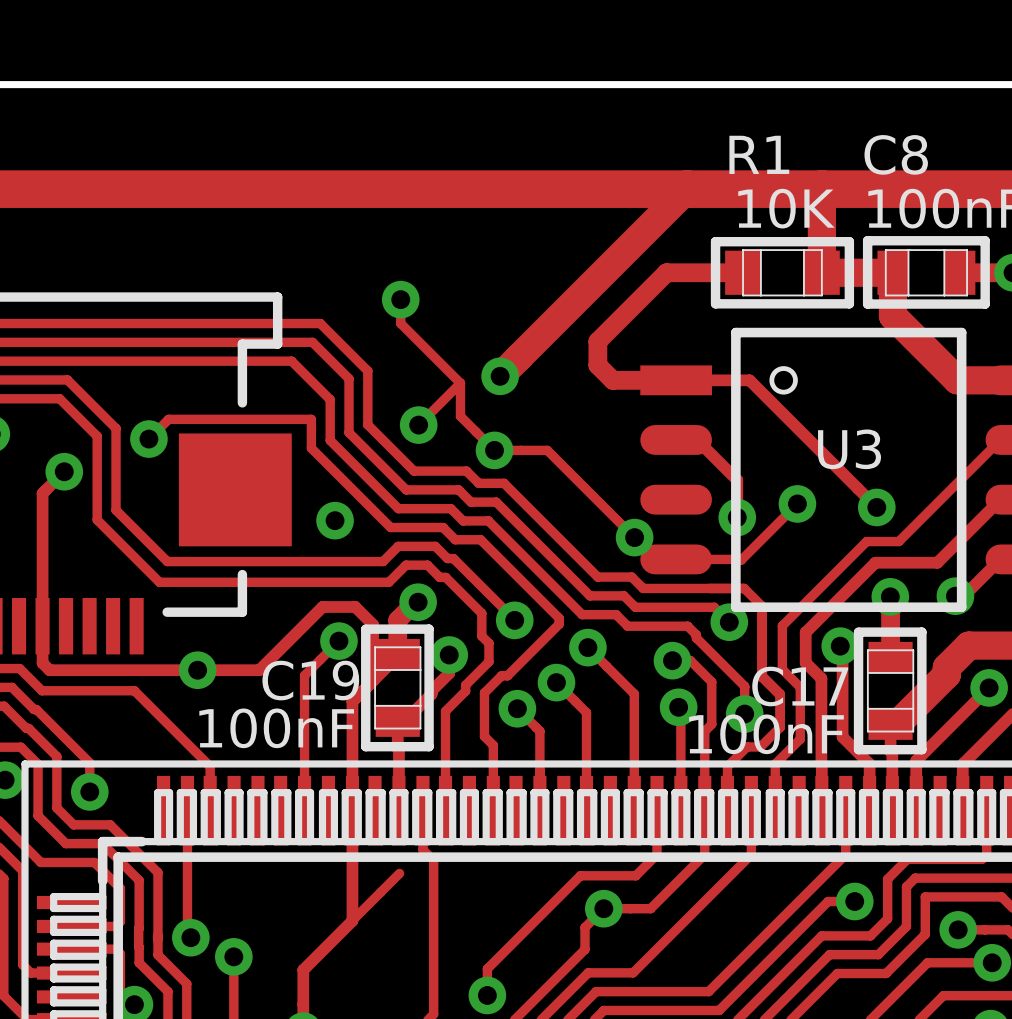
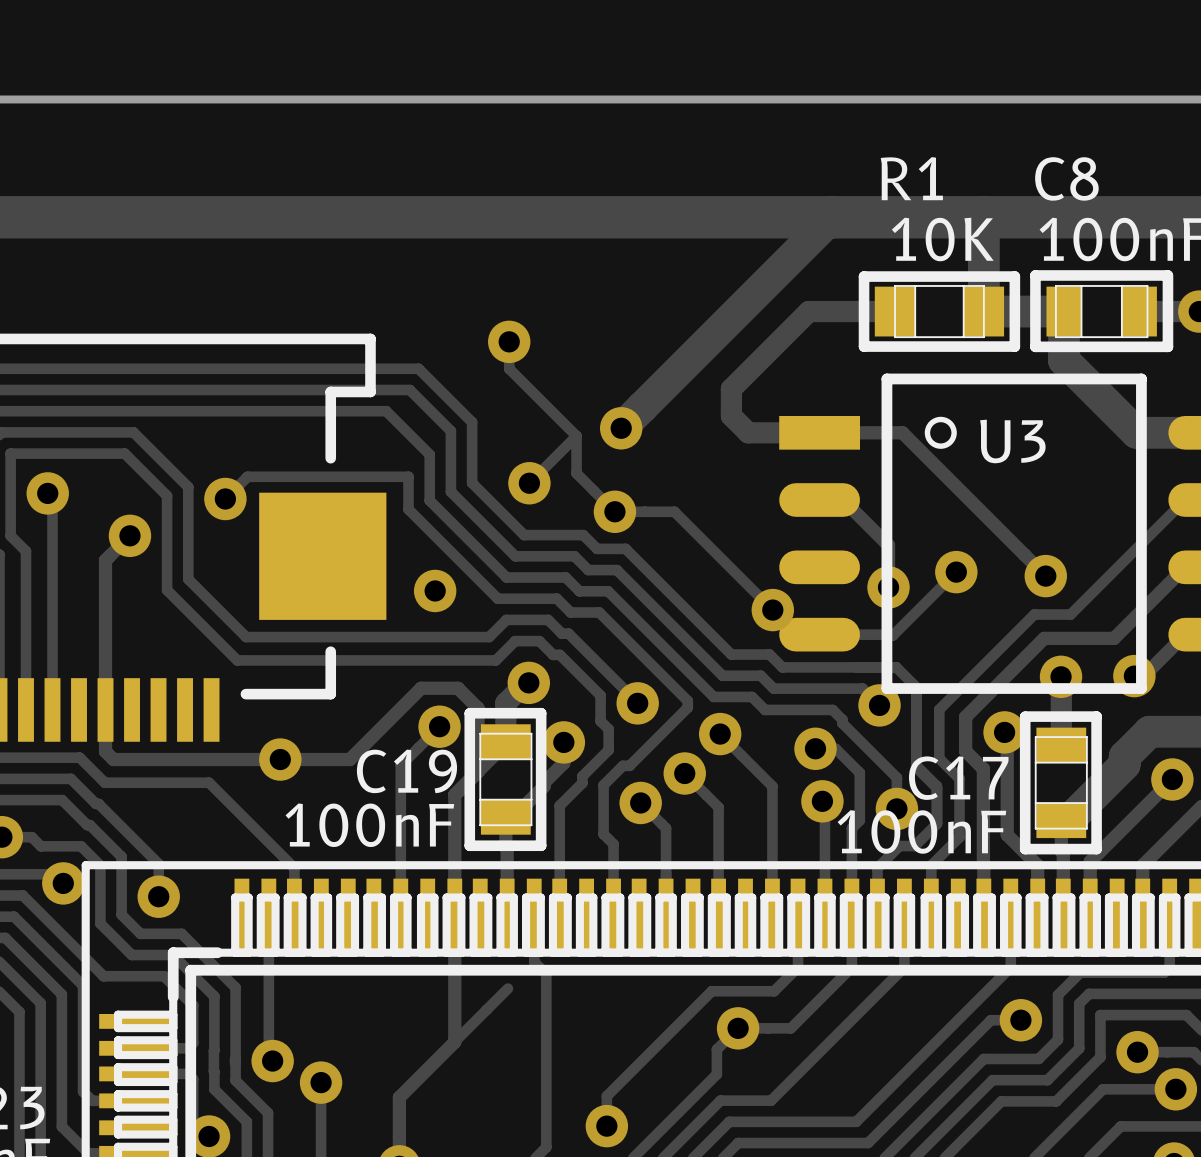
U3 name position: U3 (849, 449) -> U3 (1012, 441)

